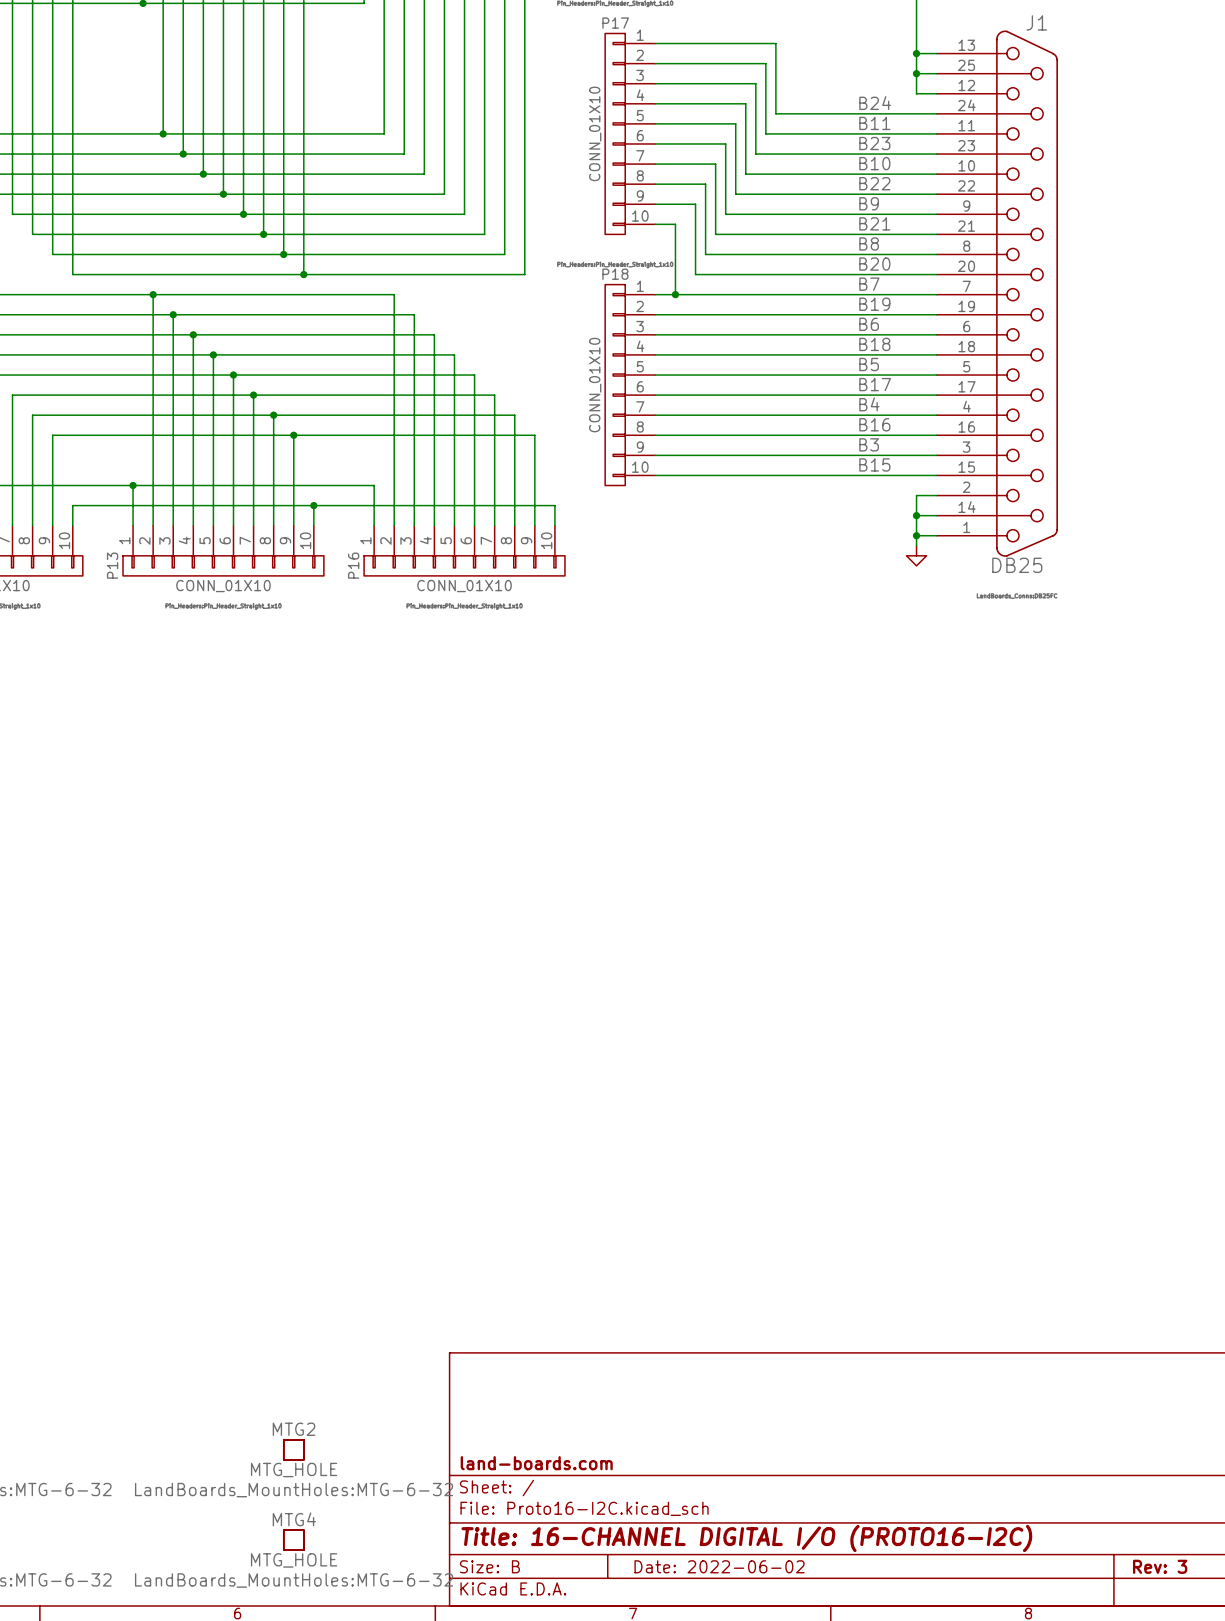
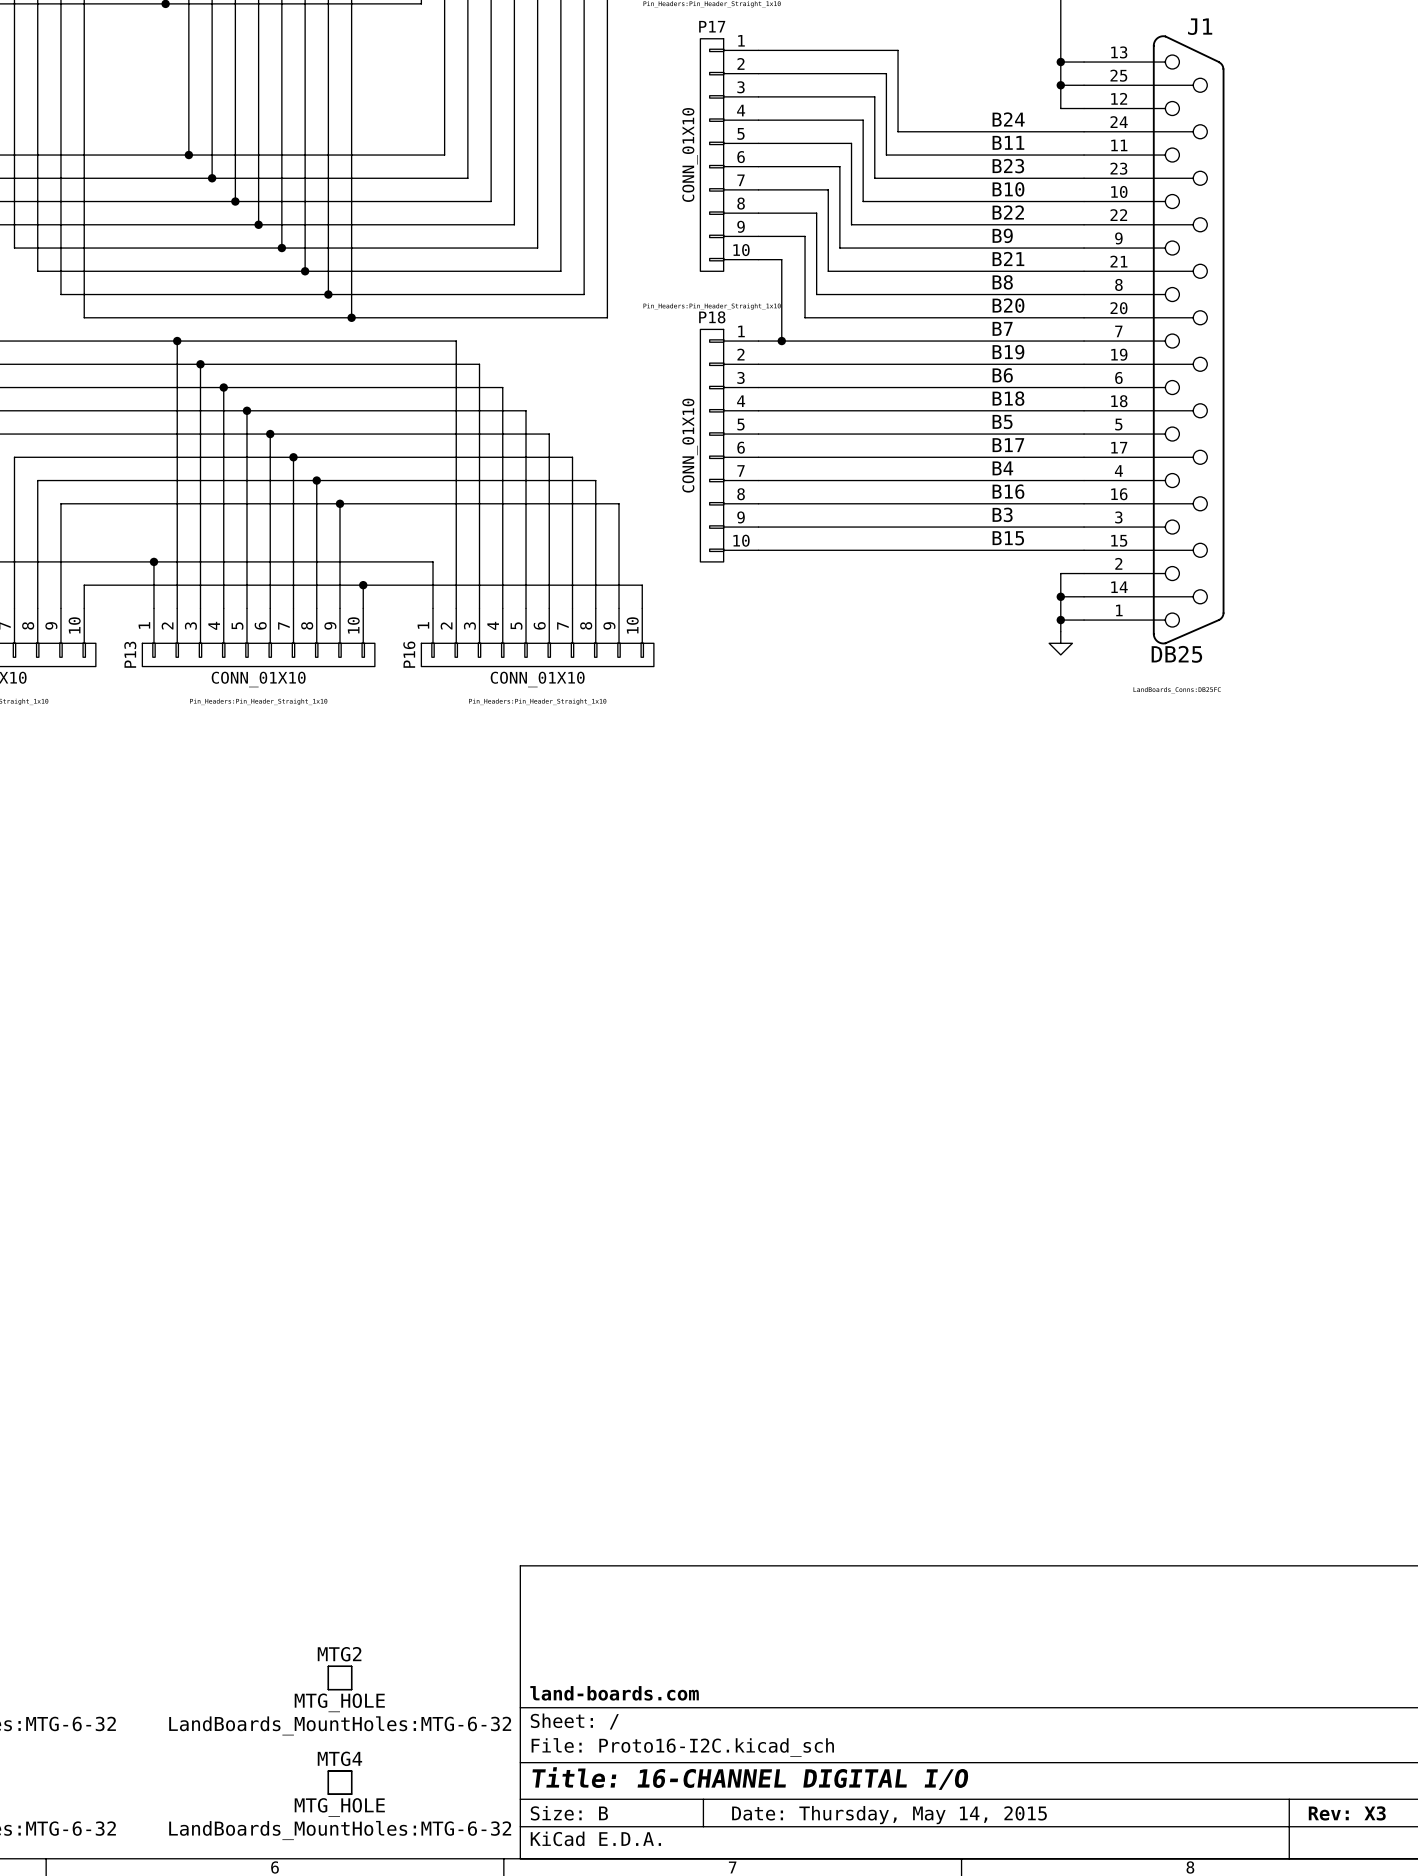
title block: Title: 16-CHANNEL DIGITAL I/O (PROTO16-I2C) (746, 1538) -> Title: 16-CHANNEL DIGITAL I/O (750, 1778)
title block: Date: 2022-06-02 (719, 1566) -> Date: Thursday, May 14, 2015 (889, 1815)
title block: Rev: 3 (1160, 1566) -> Rev: X3 (1347, 1813)

